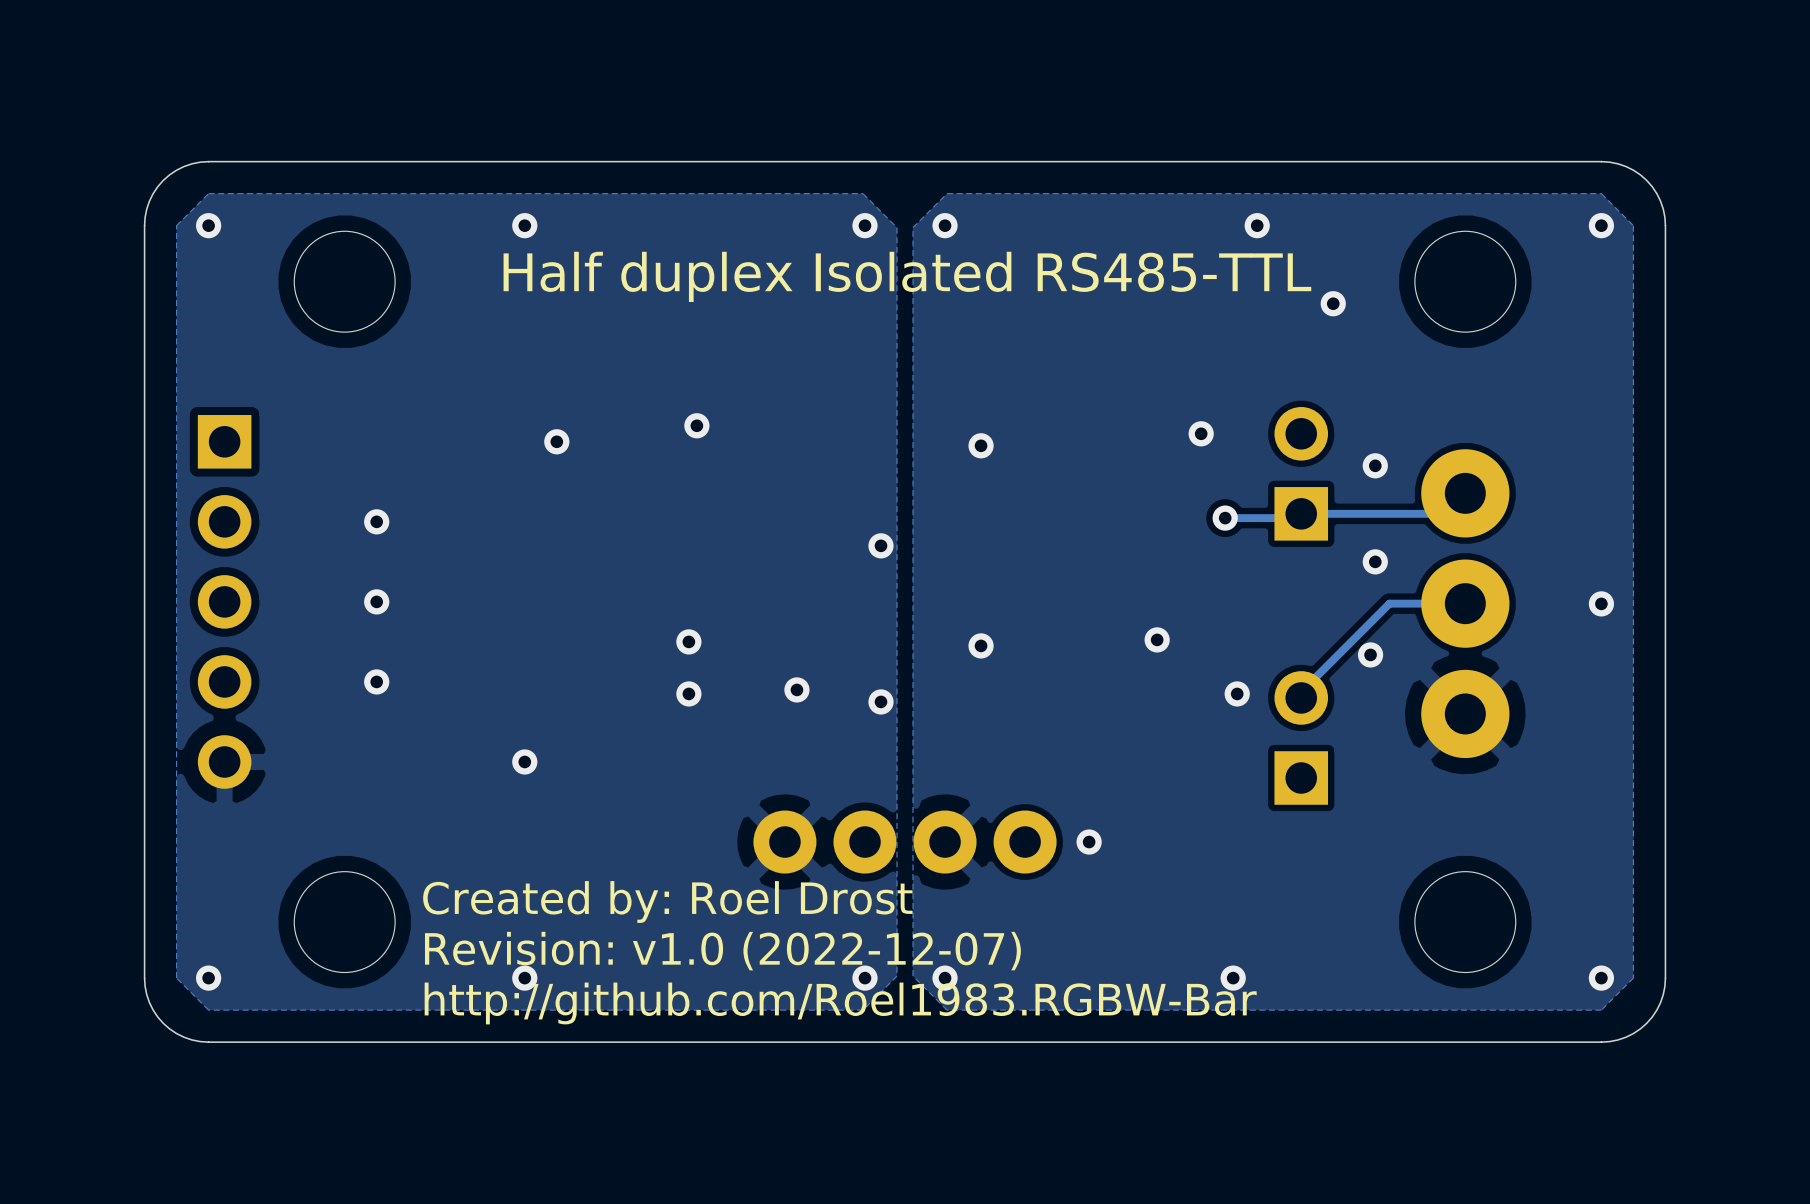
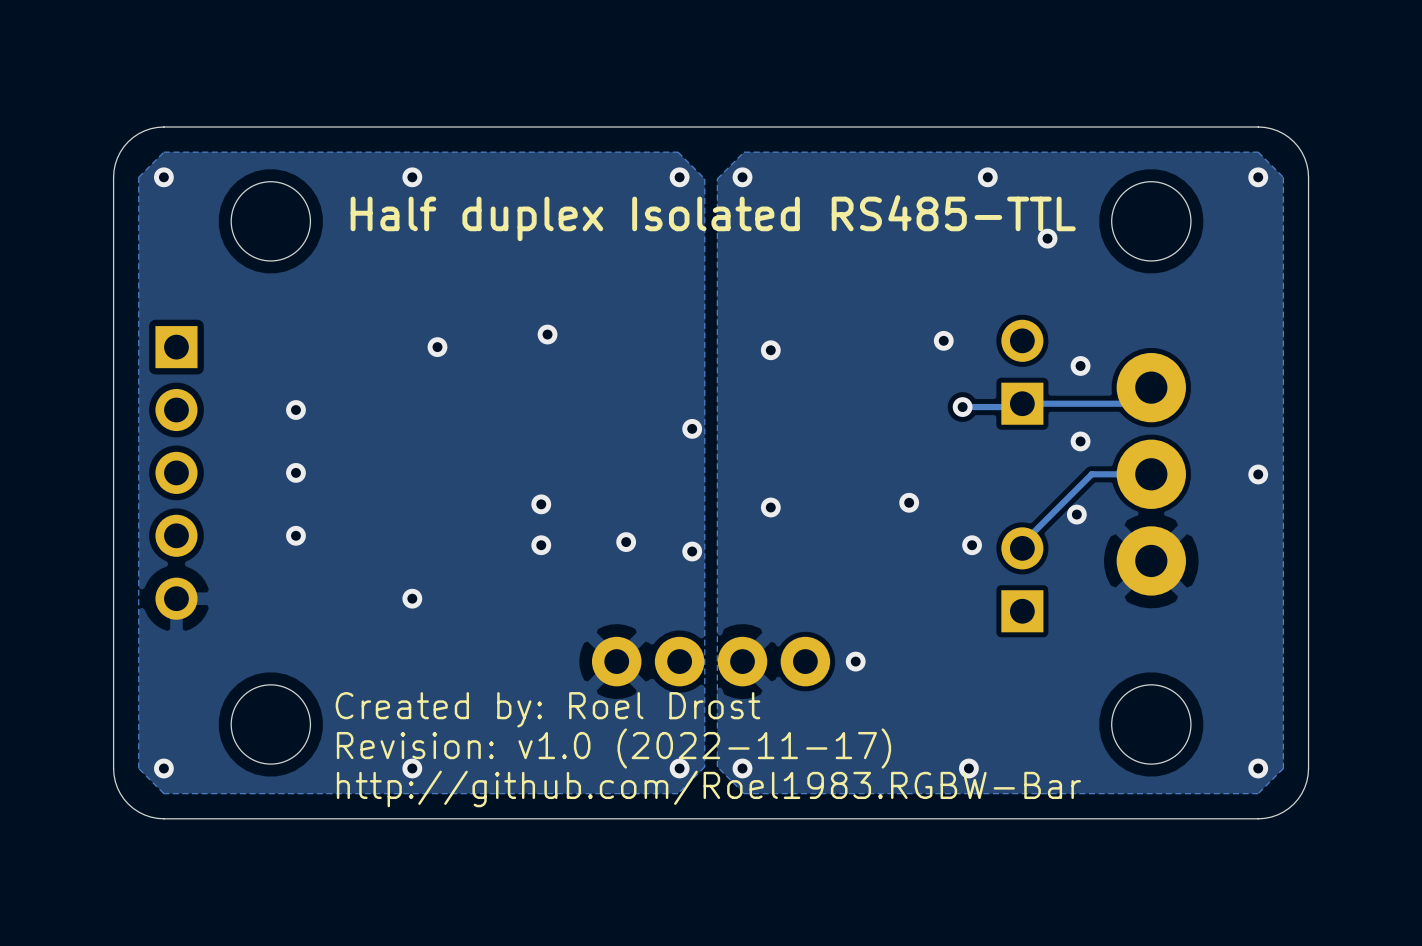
text: Revision: v1.0 (2022-12-07) (722, 951) -> Revision: v1.0 (2022-11-17) (613, 748)

